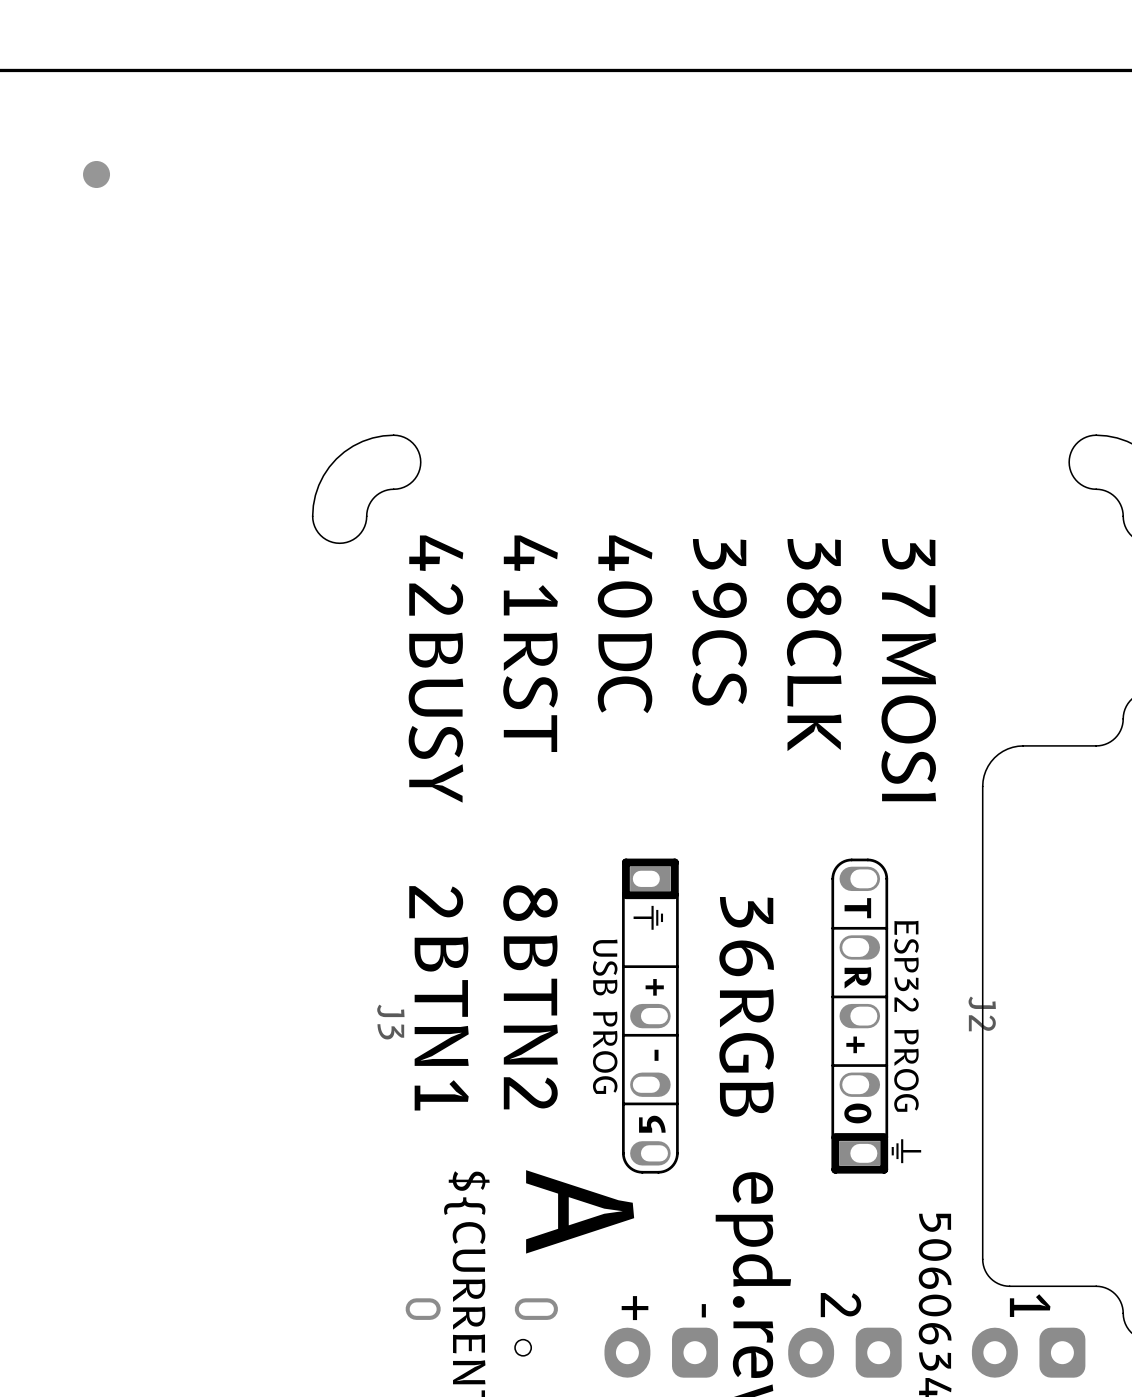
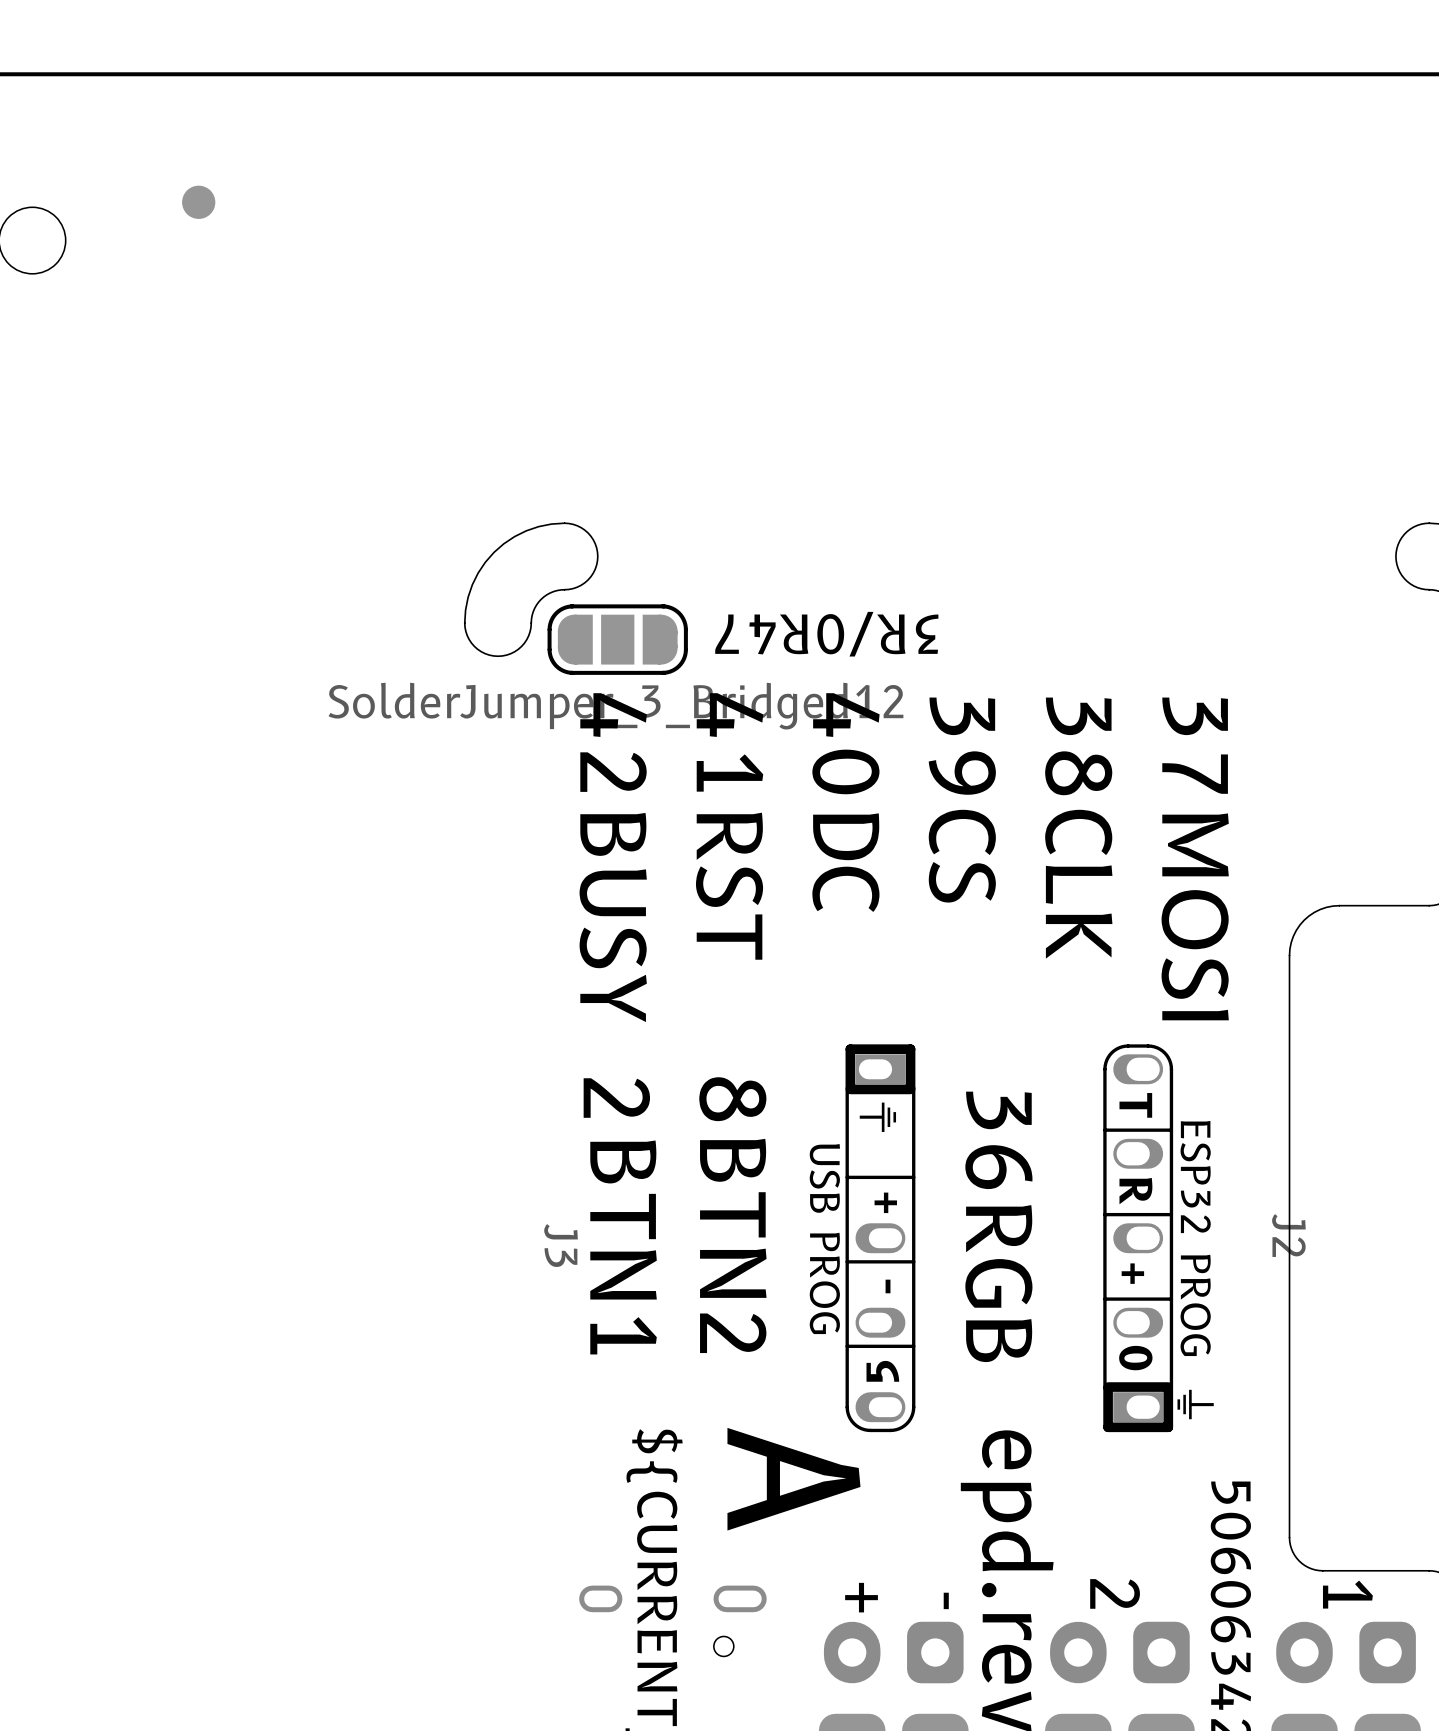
text: none -> 3R/0R47 (826, 634)
part: none -> SolderJumper_3_Bridged12 (617, 639)
text position: 42 (436, 575) -> 42 (613, 742)
text position: 41 (530, 575) -> 41 (729, 742)
text position: 40 (625, 576) -> 40 (845, 743)
text position: 39 (719, 578) -> 39 (962, 746)
text position: 38 (814, 578) -> 38 (1078, 746)
text position: 37 (908, 578) -> 37 (1195, 745)
text position: CS (719, 667) -> CS (962, 856)
text position: DC (625, 673) -> DC (845, 862)
text position: CLK (814, 690) -> CLK (1078, 884)
text position: RST (530, 692) -> RST (729, 886)
text position: BUSY (435, 717) -> BUSY (613, 917)
text position: MOSI (908, 717) -> MOSI (1195, 916)

